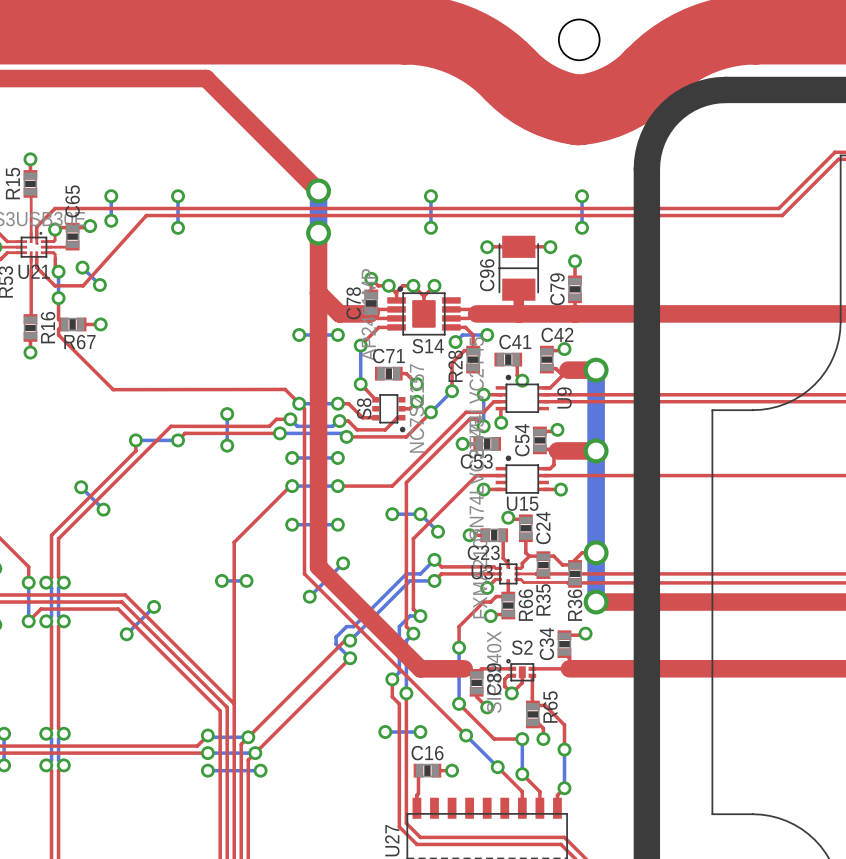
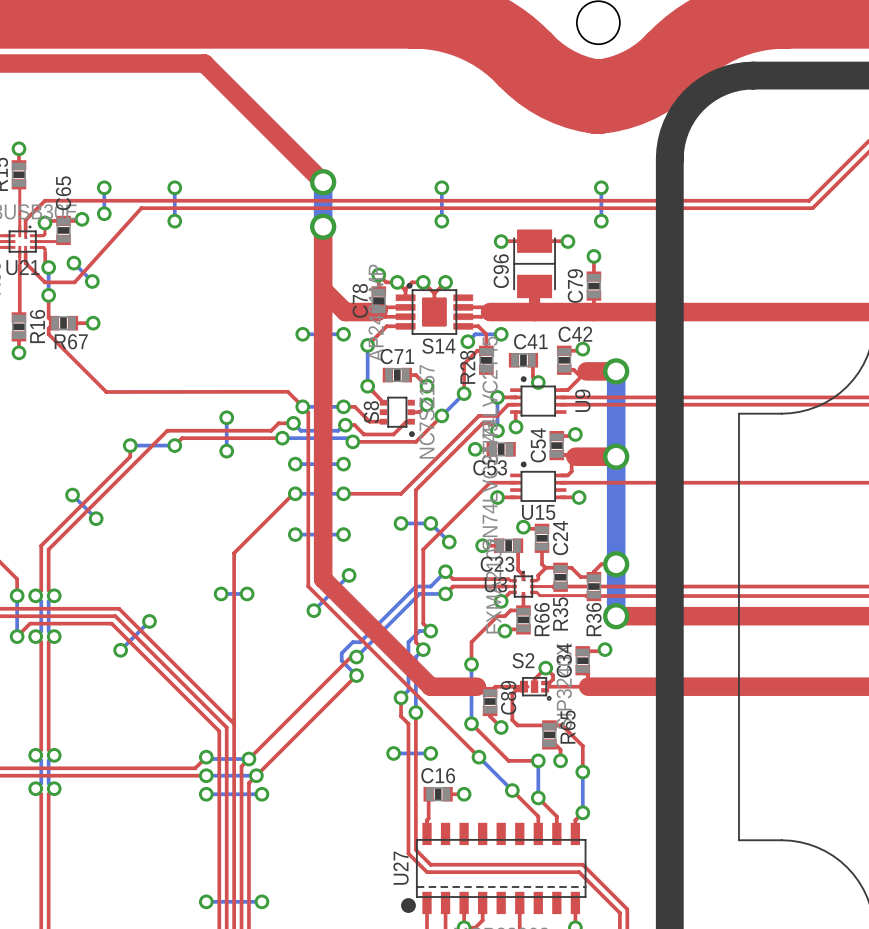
top track: none -> (545, 683) (549, 683) (553, 679) (553, 675) (545, 668) (534, 679) (534, 686)
S2 rotation: 0° (521, 670) -> 180° (535, 688)
top track: (522, 672) (522, 682) (511, 693) (504, 686) (504, 679) (508, 675) (512, 675) -> none
top track: (532, 675) (532, 705) -> (524, 690) (516, 690) (512, 694) (512, 720) (517, 725) (549, 725)
via position: (511, 693) -> (545, 668)

